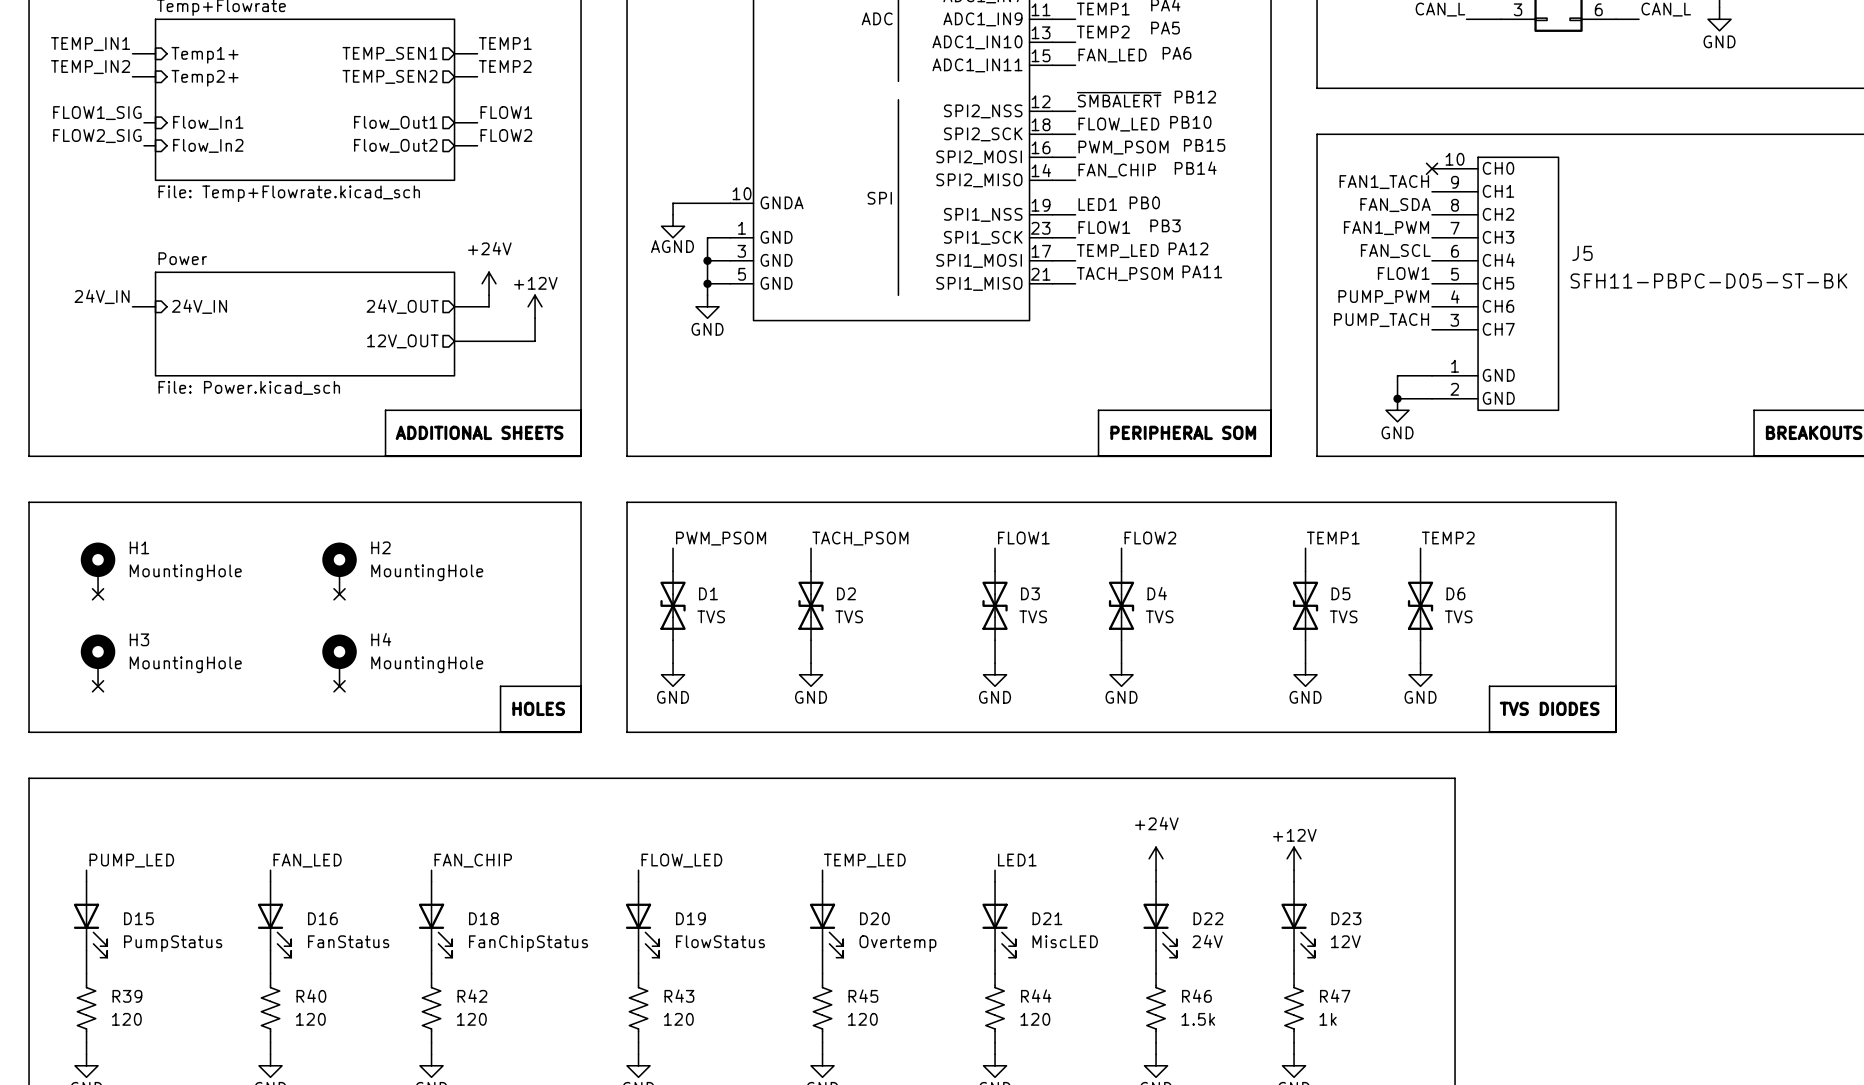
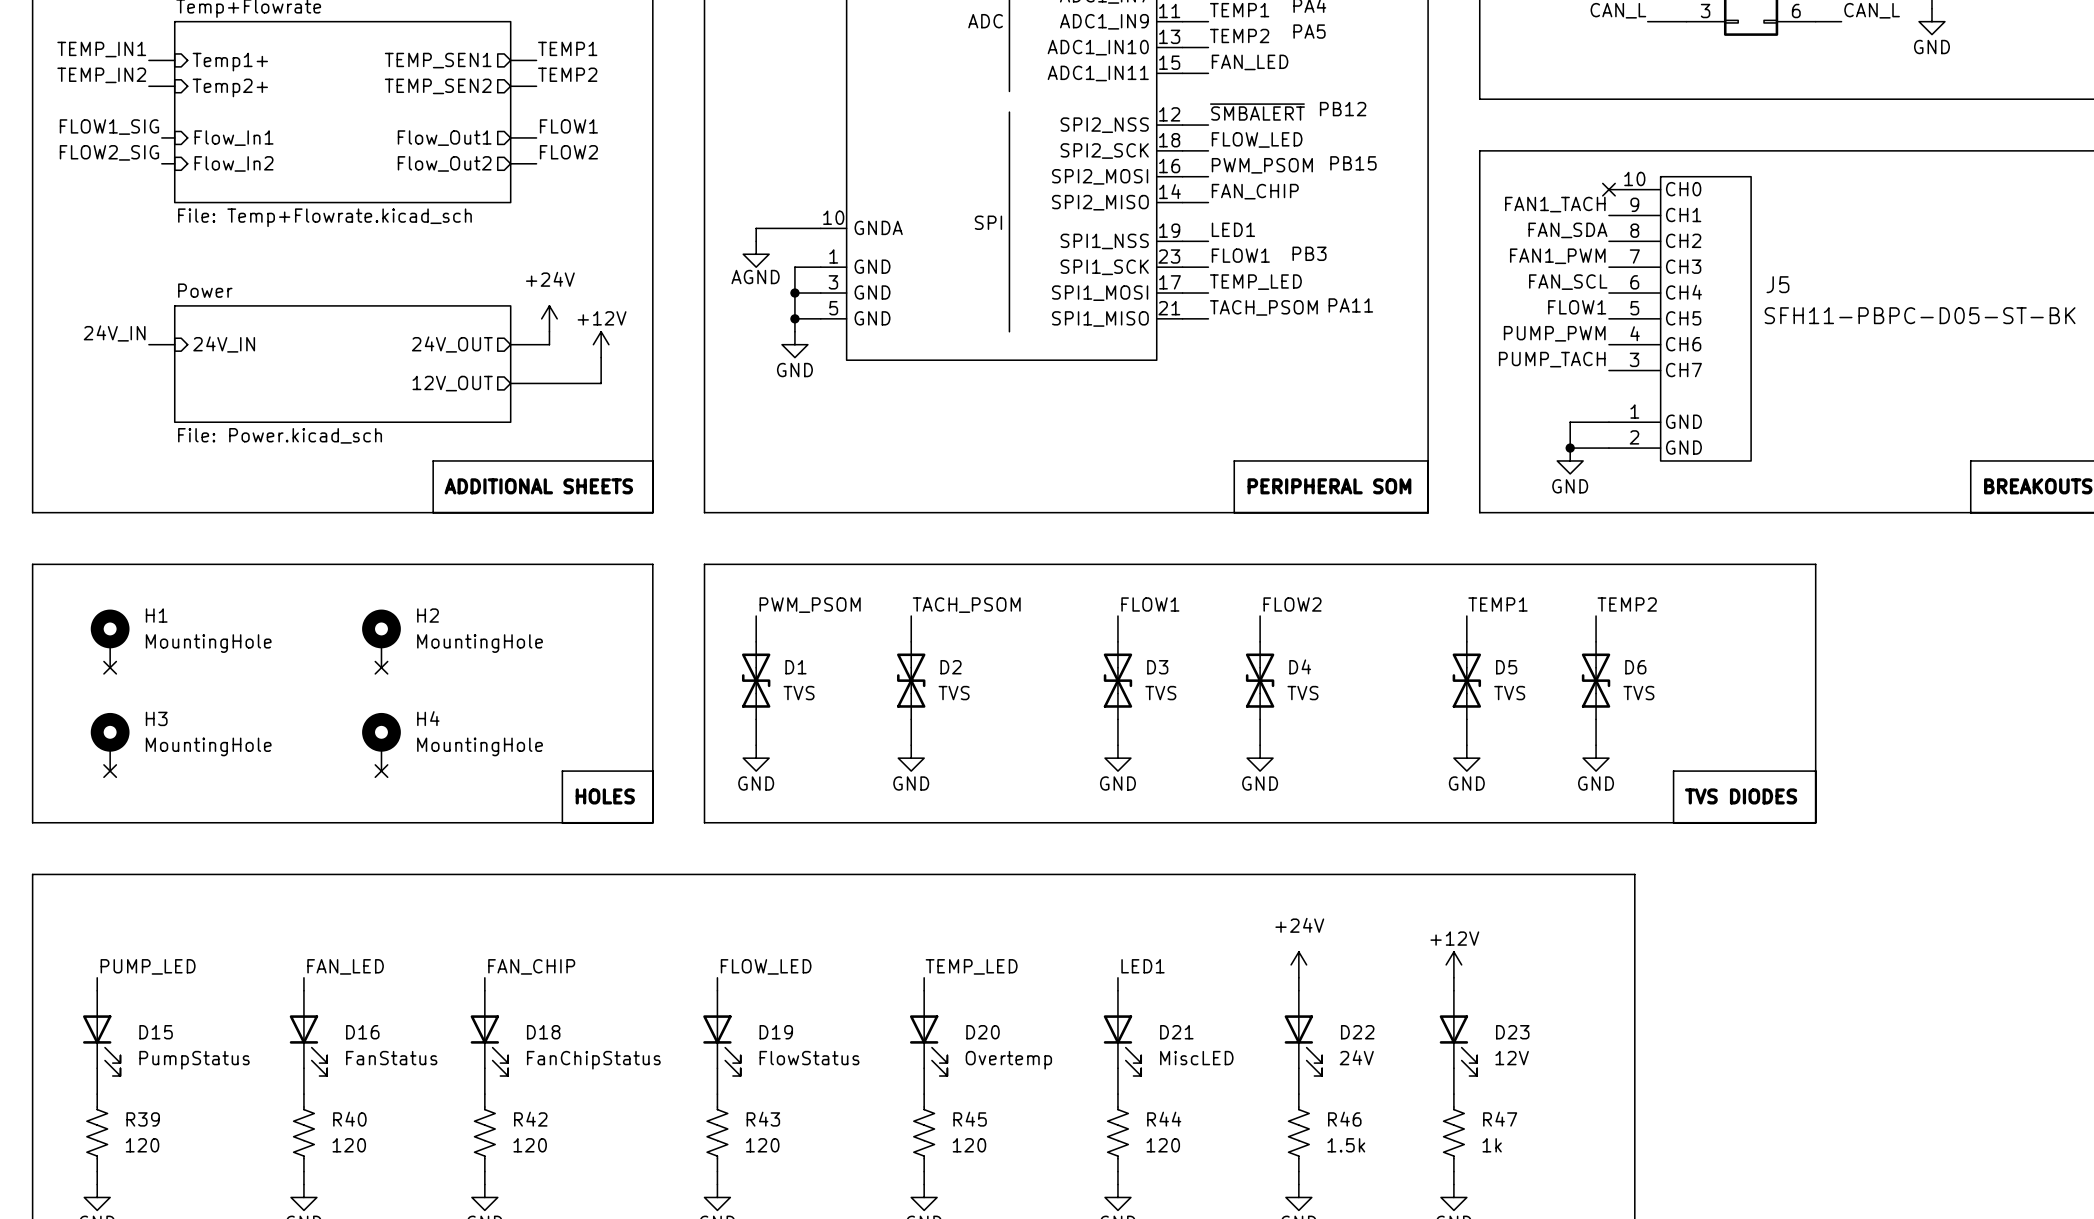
text: PA6 (1177, 53) -> none
text: PB10 (1190, 122) -> none
text: PB14 (1195, 168) -> none
text: PB0 (1144, 202) -> none
text: PA12 (1188, 248) -> none

